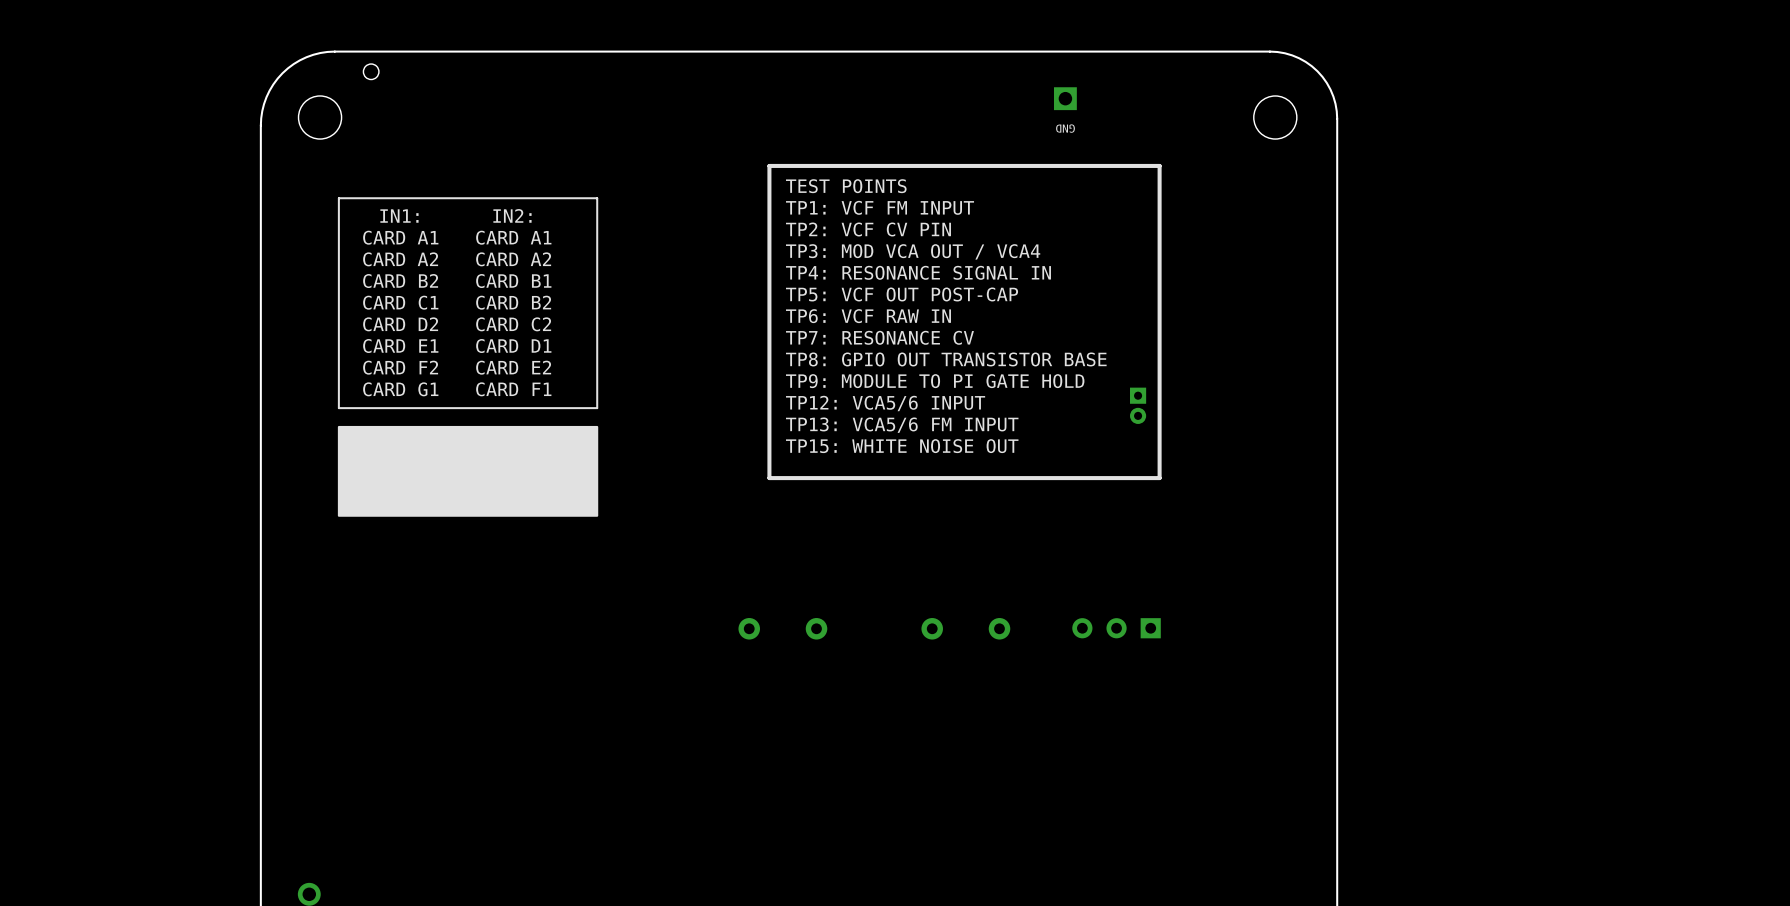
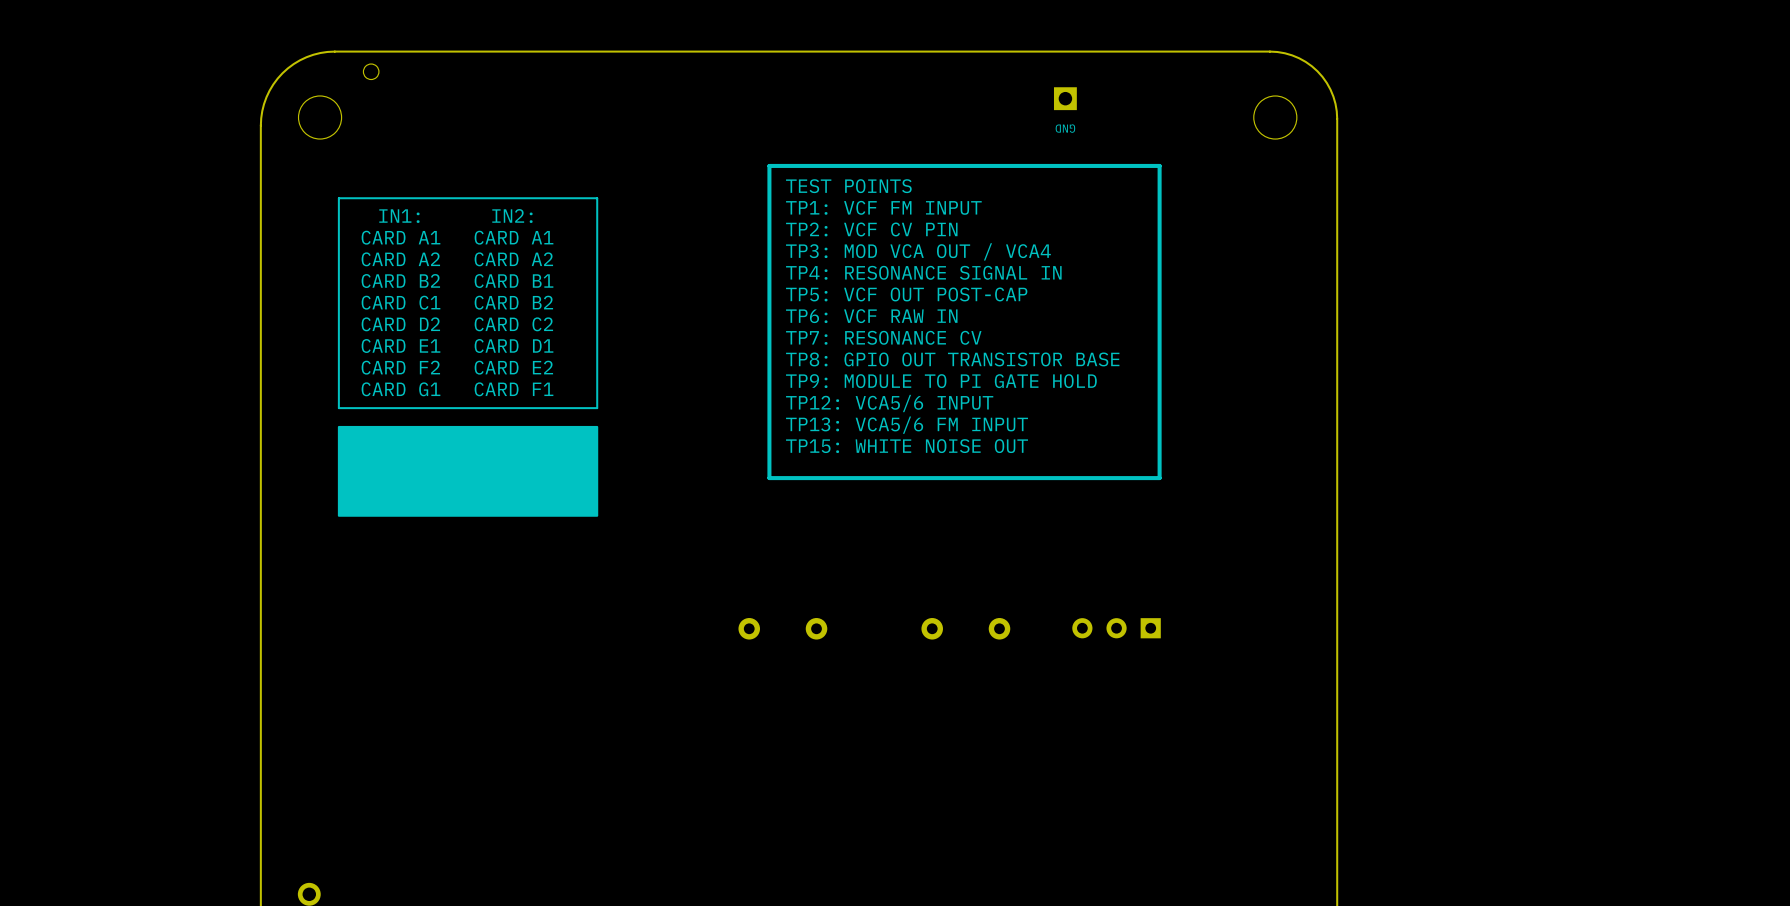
part: (1138, 405) -> none

